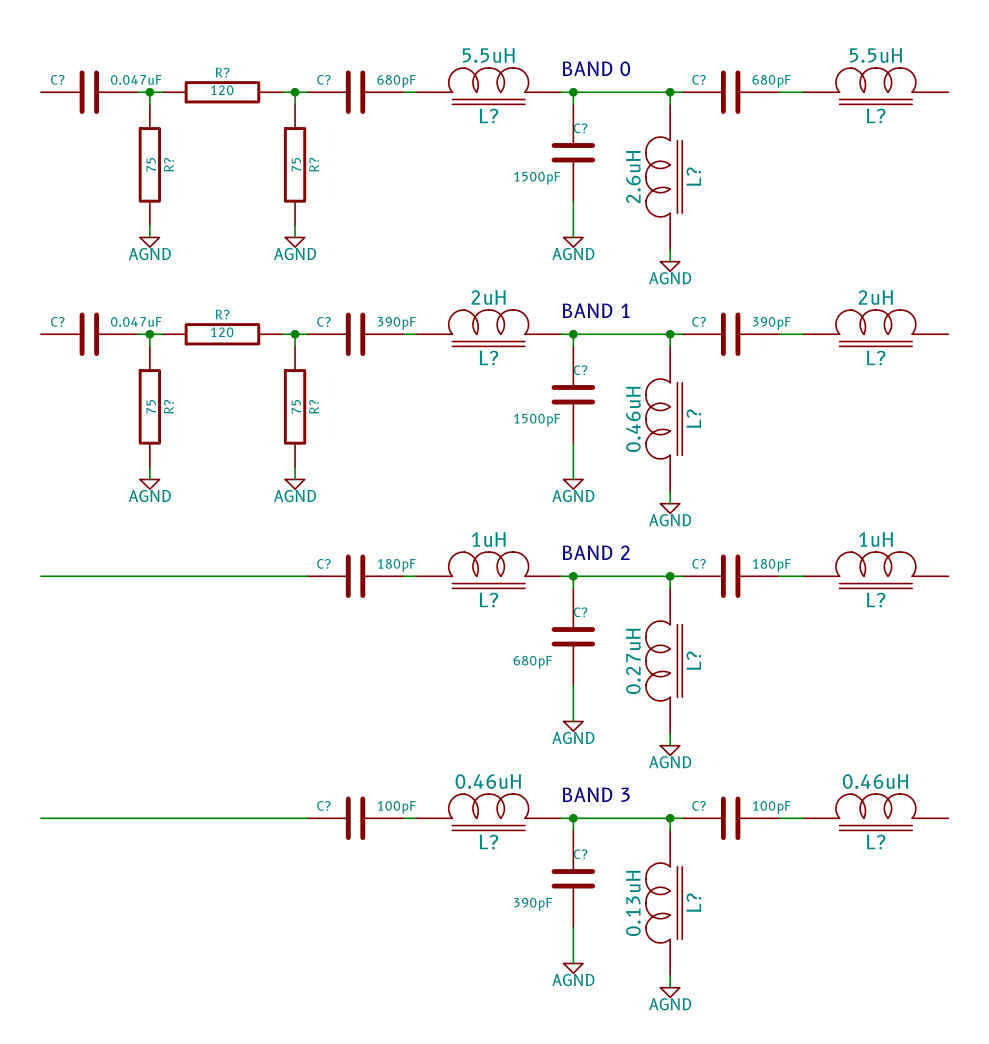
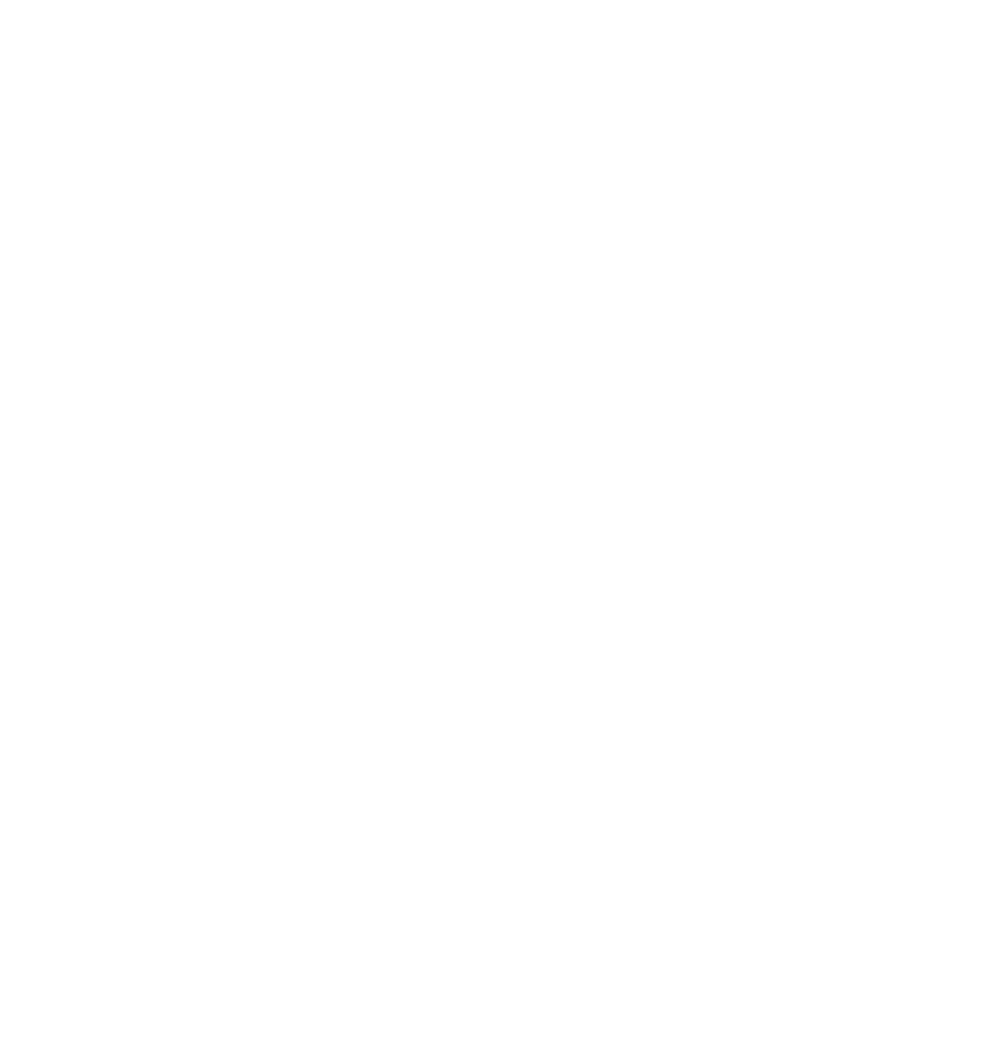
text: BAND 0 (596, 68) -> none
L?: 5.5uH (488, 86) -> none
L?: 5.5uH (875, 86) -> none
C?: 0.047uF (89, 92) -> none
wire: (137, 92) (161, 92) -> none
wire: (149, 92) (149, 104) -> none
junction: (149, 92) -> none
R?: 120 (222, 92) -> none
wire: (282, 92) (307, 92) -> none
wire: (295, 92) (295, 104) -> none
junction: (295, 92) -> none
C?: 680pF (355, 92) -> none
wire: (403, 92) (416, 92) -> none
wire: (561, 92) (682, 92) -> none
wire: (573, 92) (573, 104) -> none
junction: (573, 92) -> none
wire: (670, 92) (670, 104) -> none
junction: (670, 92) -> none
C?: 680pF (730, 92) -> none
wire: (779, 92) (803, 92) -> none
C?: 1500pF (573, 152) -> none
R?: 75 (149, 164) -> none
R?: 75 (295, 164) -> none
L?: 2.6uH (664, 176) -> none
wire: (573, 201) (573, 237) -> none
wire: (149, 225) (149, 237) -> none
wire: (295, 225) (295, 237) -> none
power symbol: AGND (149, 242) -> none
power symbol: AGND (295, 242) -> none
power symbol: AGND (573, 242) -> none
wire: (670, 249) (670, 261) -> none
power symbol: AGND (670, 266) -> none
text: BAND 1 (596, 310) -> none
L?: 2uH (488, 328) -> none
L?: 2uH (875, 328) -> none
C?: 0.047uF (89, 334) -> none
wire: (137, 334) (161, 334) -> none
wire: (149, 334) (149, 346) -> none
junction: (149, 334) -> none
R?: 120 (222, 334) -> none
wire: (282, 334) (307, 334) -> none
wire: (295, 334) (295, 346) -> none
junction: (295, 334) -> none
C?: 390pF (355, 334) -> none
wire: (403, 334) (416, 334) -> none
wire: (561, 334) (682, 334) -> none
wire: (573, 334) (573, 346) -> none
junction: (573, 334) -> none
wire: (670, 334) (670, 346) -> none
junction: (670, 334) -> none
C?: 390pF (730, 334) -> none
wire: (779, 334) (803, 334) -> none
C?: 1500pF (573, 394) -> none
R?: 75 (149, 406) -> none
R?: 75 (295, 406) -> none
L?: 0.46uH (664, 418) -> none
wire: (573, 443) (573, 479) -> none
wire: (149, 467) (149, 479) -> none
wire: (295, 467) (295, 479) -> none
power symbol: AGND (149, 484) -> none
power symbol: AGND (295, 484) -> none
power symbol: AGND (573, 484) -> none
wire: (670, 491) (670, 503) -> none
power symbol: AGND (670, 508) -> none
text: BAND 2 (596, 552) -> none
L?: 1uH (488, 570) -> none
L?: 1uH (875, 570) -> none
wire: (40, 576) (307, 576) -> none
C?: 180pF (355, 576) -> none
wire: (403, 576) (416, 576) -> none
wire: (561, 576) (682, 576) -> none
wire: (573, 576) (573, 588) -> none
junction: (573, 576) -> none
wire: (670, 576) (670, 588) -> none
junction: (670, 576) -> none
C?: 180pF (730, 576) -> none
wire: (779, 576) (803, 576) -> none
C?: 680pF (573, 636) -> none
L?: 0.27uH (664, 660) -> none
wire: (573, 685) (573, 721) -> none
power symbol: AGND (573, 726) -> none
wire: (670, 733) (670, 745) -> none
power symbol: AGND (670, 750) -> none
text: BAND 3 (596, 794) -> none
L?: 0.46uH (488, 812) -> none
L?: 0.46uH (875, 812) -> none
wire: (40, 818) (307, 818) -> none
C?: 100pF (355, 818) -> none
wire: (403, 818) (416, 818) -> none
wire: (561, 818) (682, 818) -> none
wire: (573, 818) (573, 830) -> none
junction: (573, 818) -> none
wire: (670, 818) (670, 830) -> none
junction: (670, 818) -> none
C?: 100pF (730, 818) -> none
wire: (779, 818) (803, 818) -> none
C?: 390pF (573, 878) -> none
L?: 0.13uH (664, 903) -> none
wire: (573, 927) (573, 963) -> none
power symbol: AGND (573, 968) -> none
wire: (670, 975) (670, 987) -> none
power symbol: AGND (670, 992) -> none

